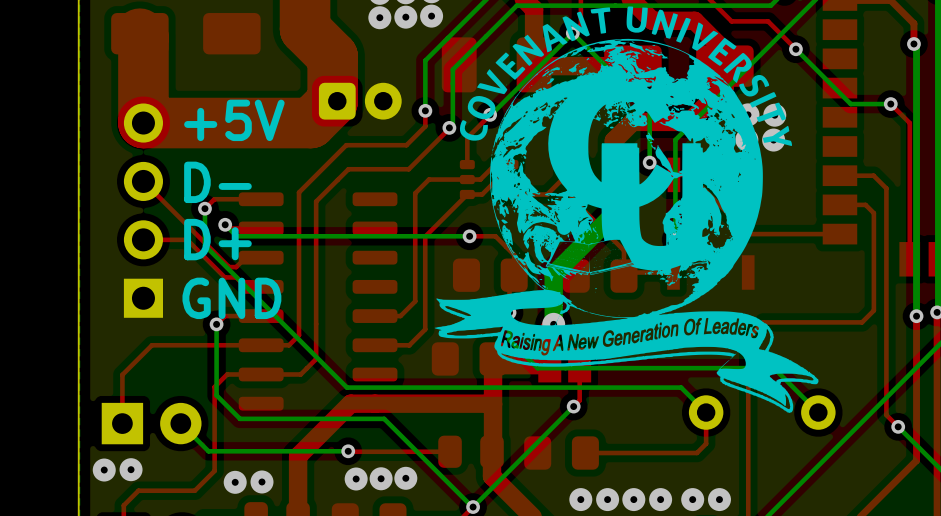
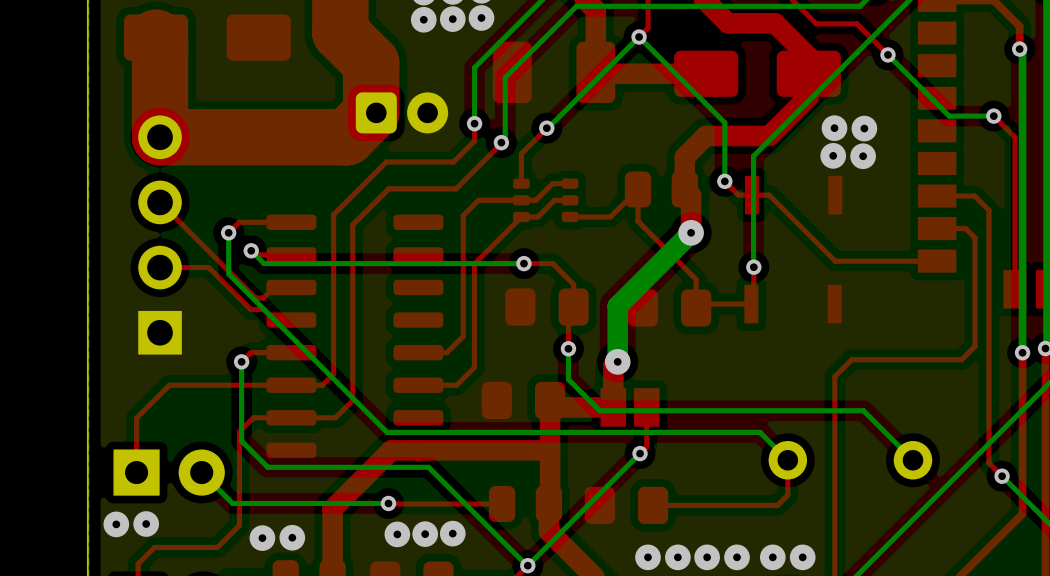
drawing: [434, 6, 819, 413] -> none
text: +5V (234, 120) -> none
text: D- (217, 182) -> none
text: D+ (217, 239) -> none
text: GND (231, 298) -> none

